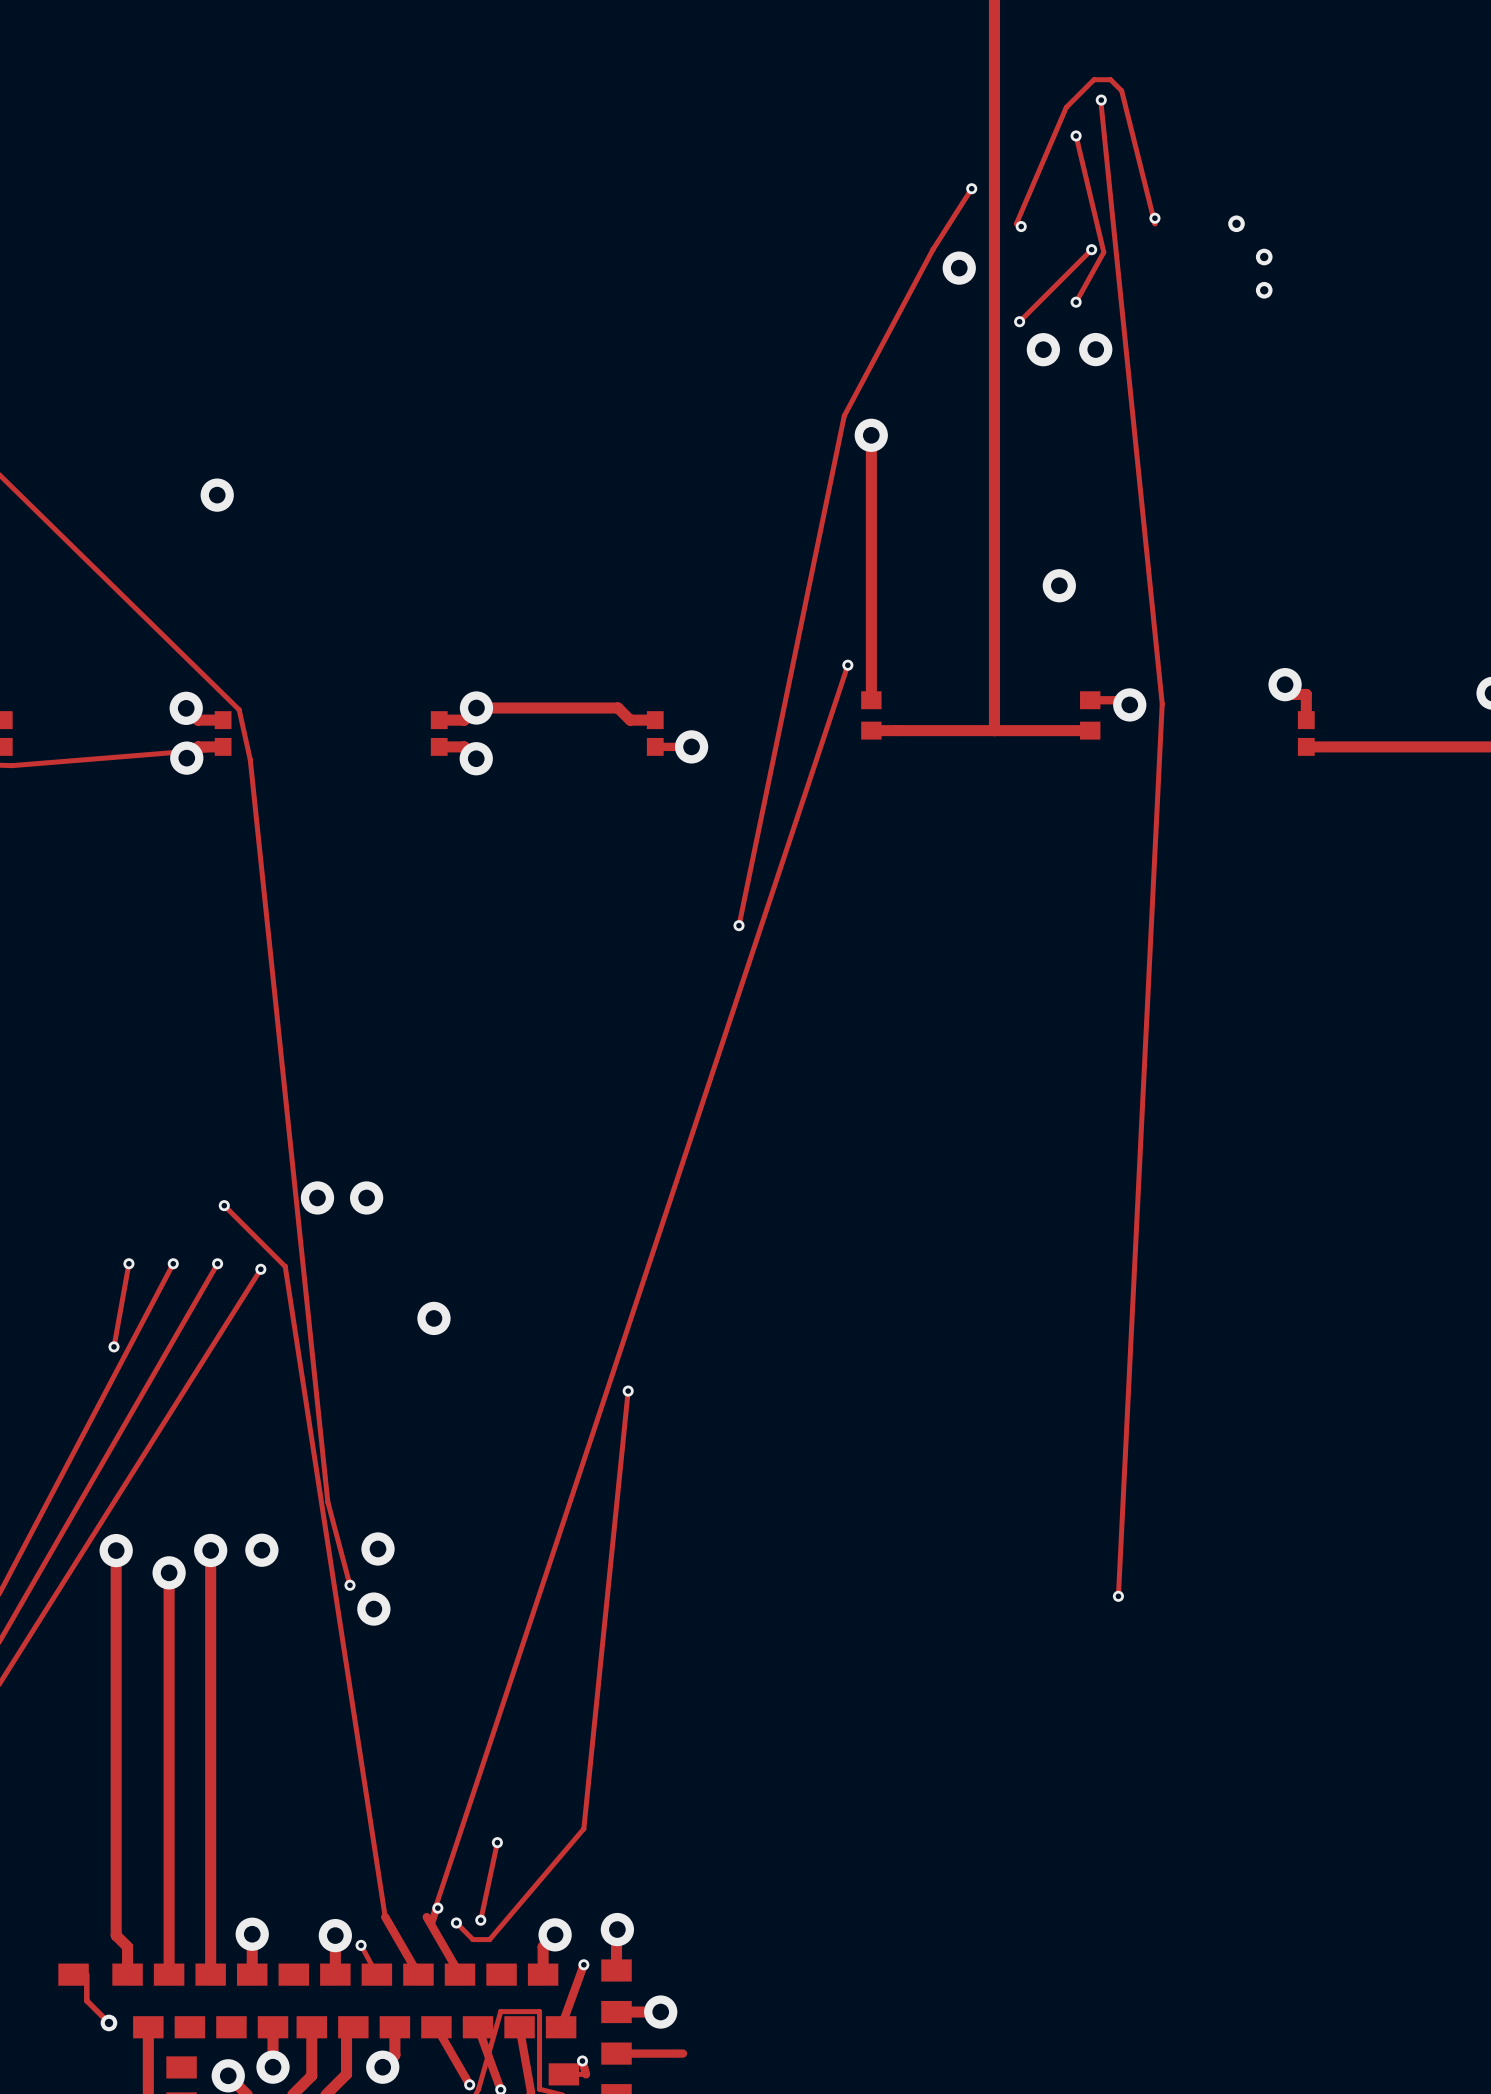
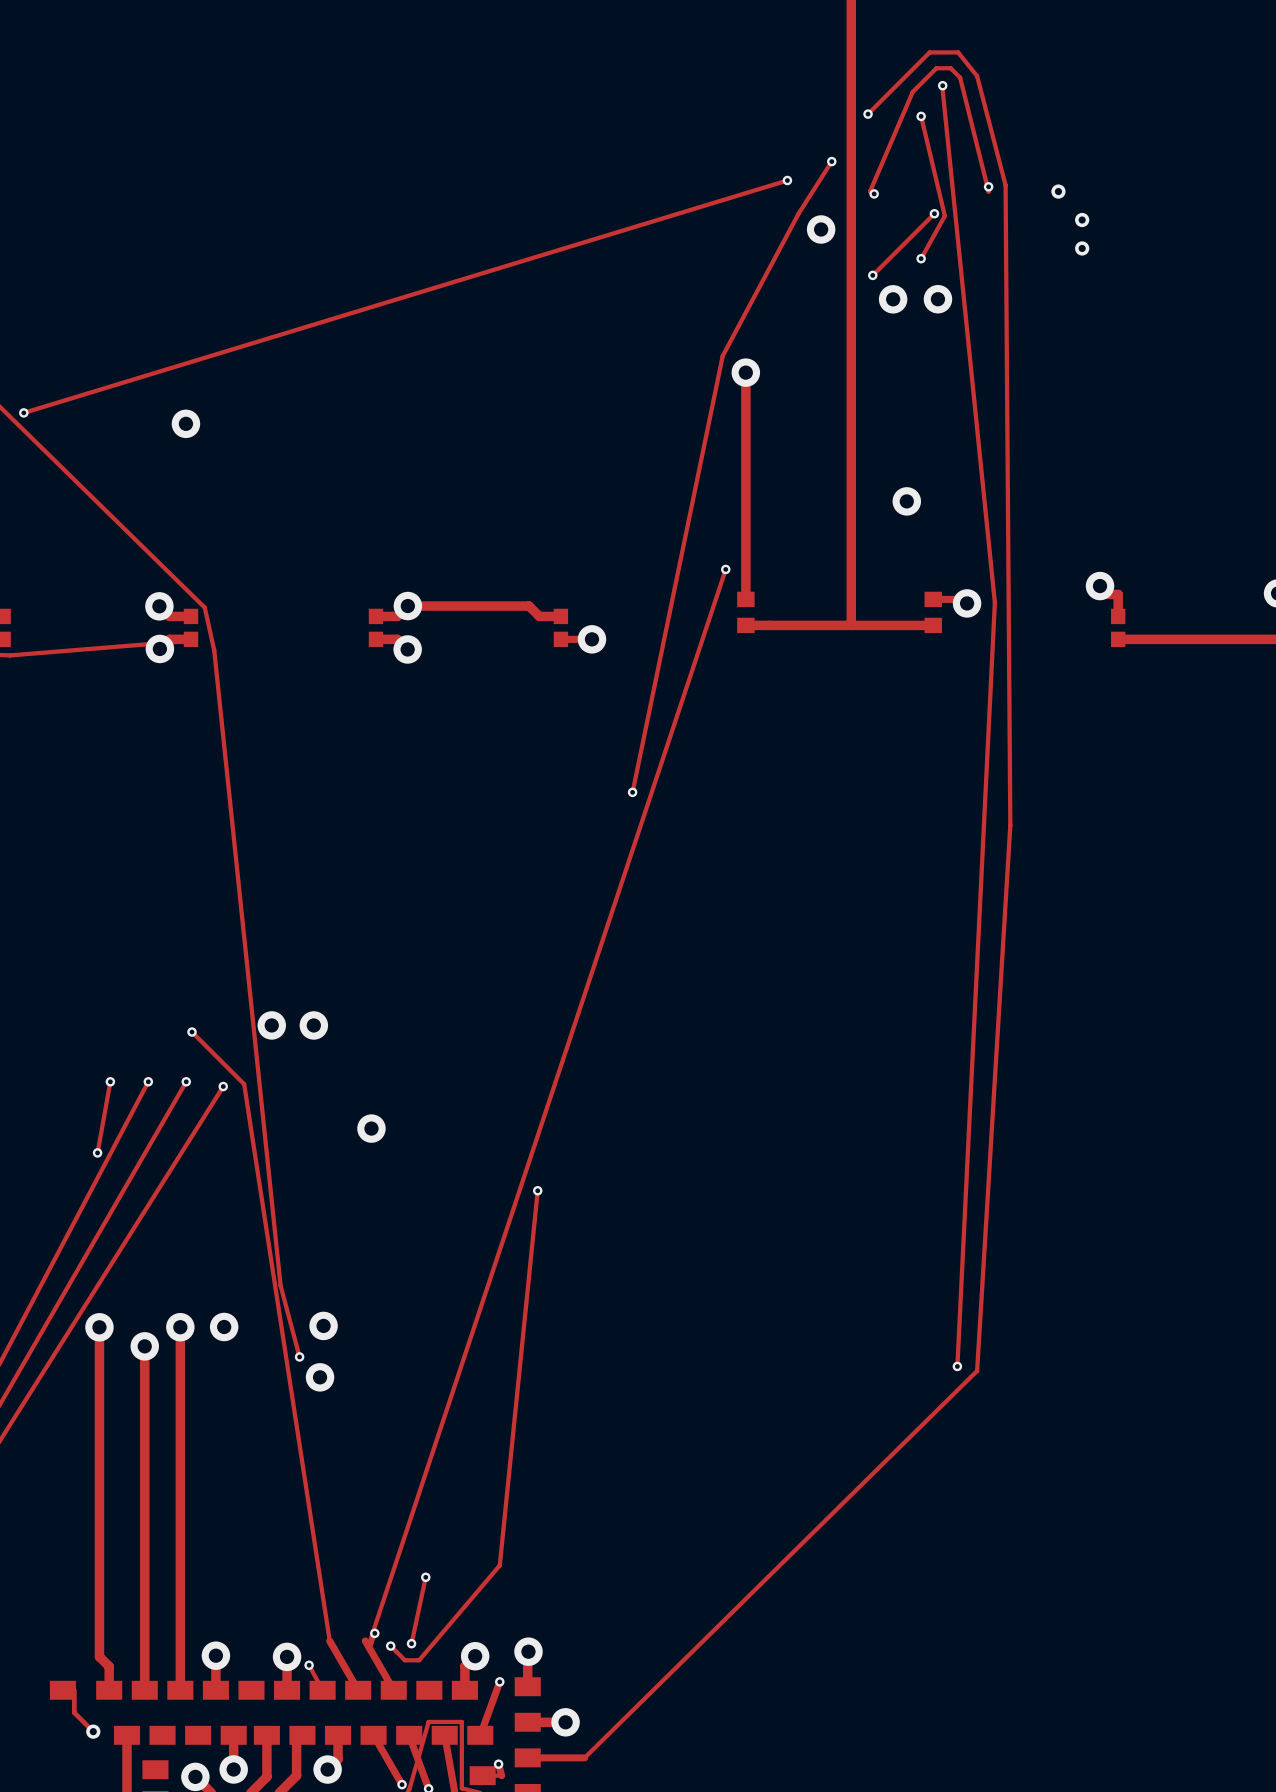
track: none -> (868, 114) (929, 52) (958, 52) (977, 76) (1005, 185) (1010, 825) (977, 1370) (584, 1757)
via: none -> (868, 114)
track: none -> (787, 180) (23, 412)
via: none -> (787, 180)
via: none -> (23, 412)

